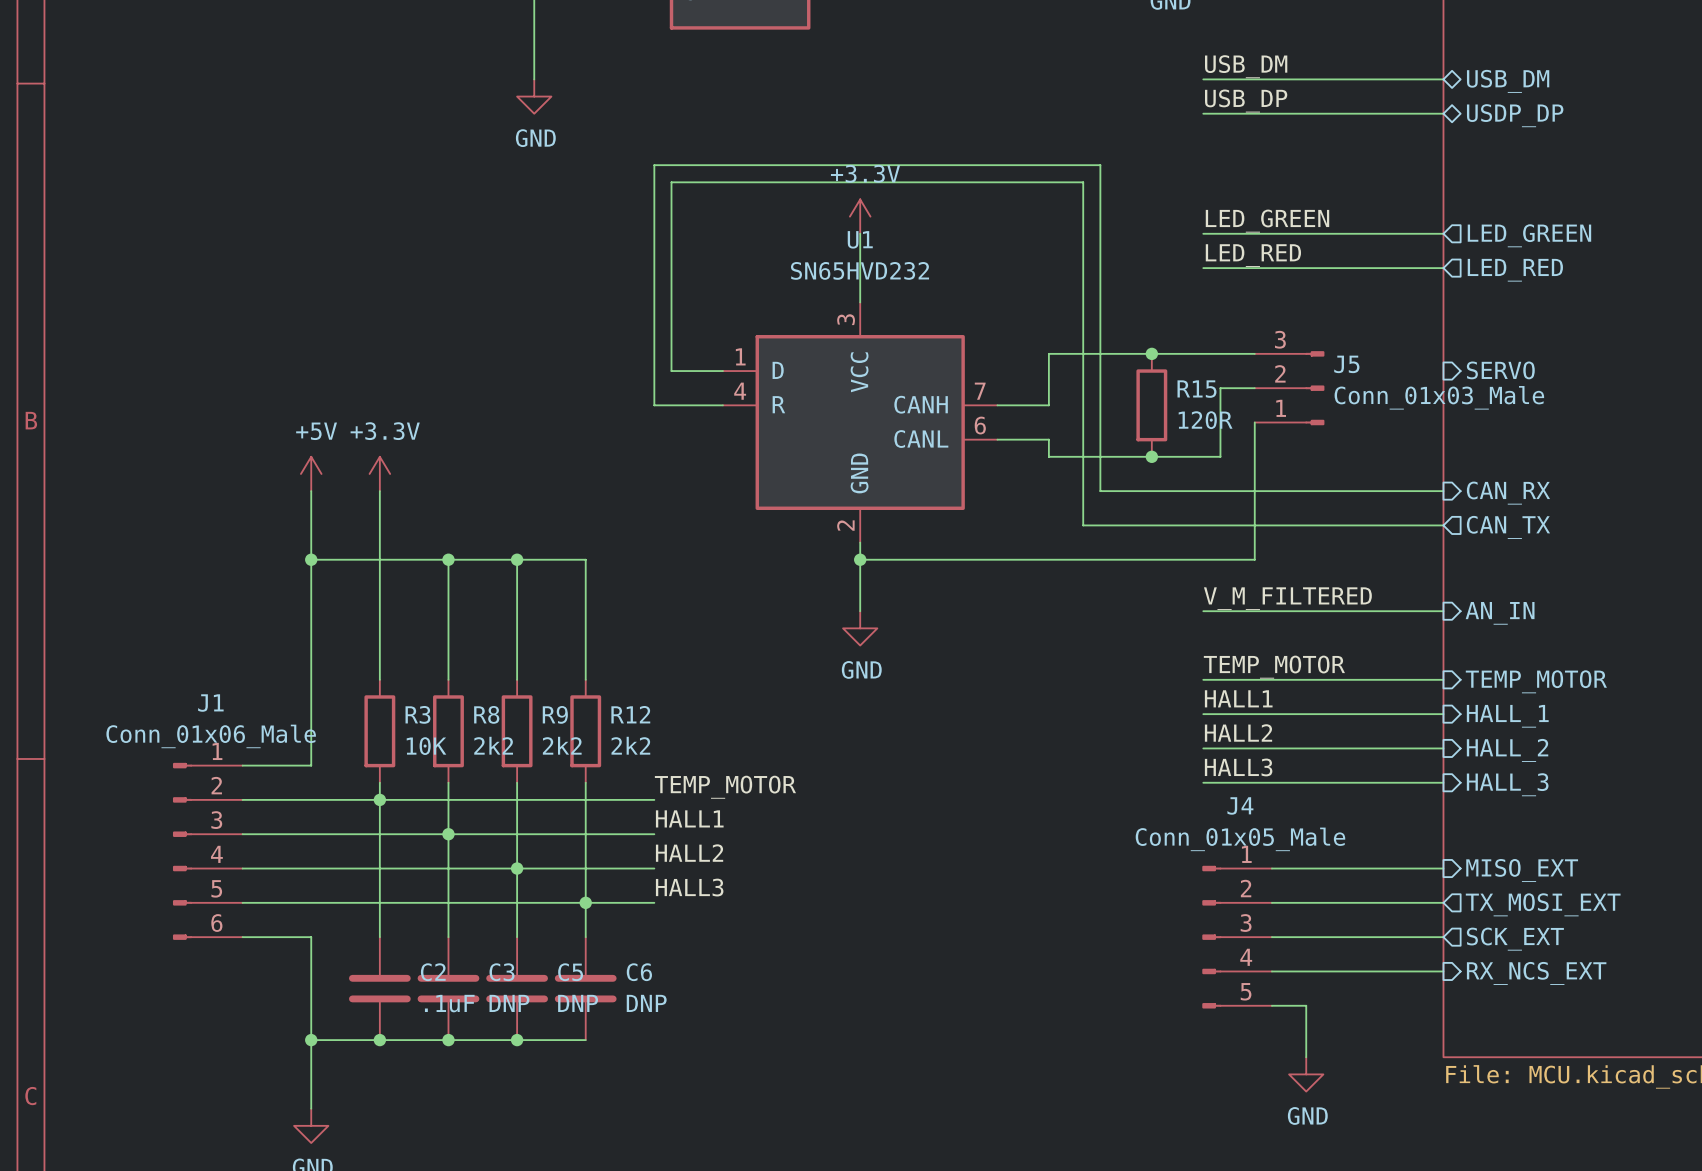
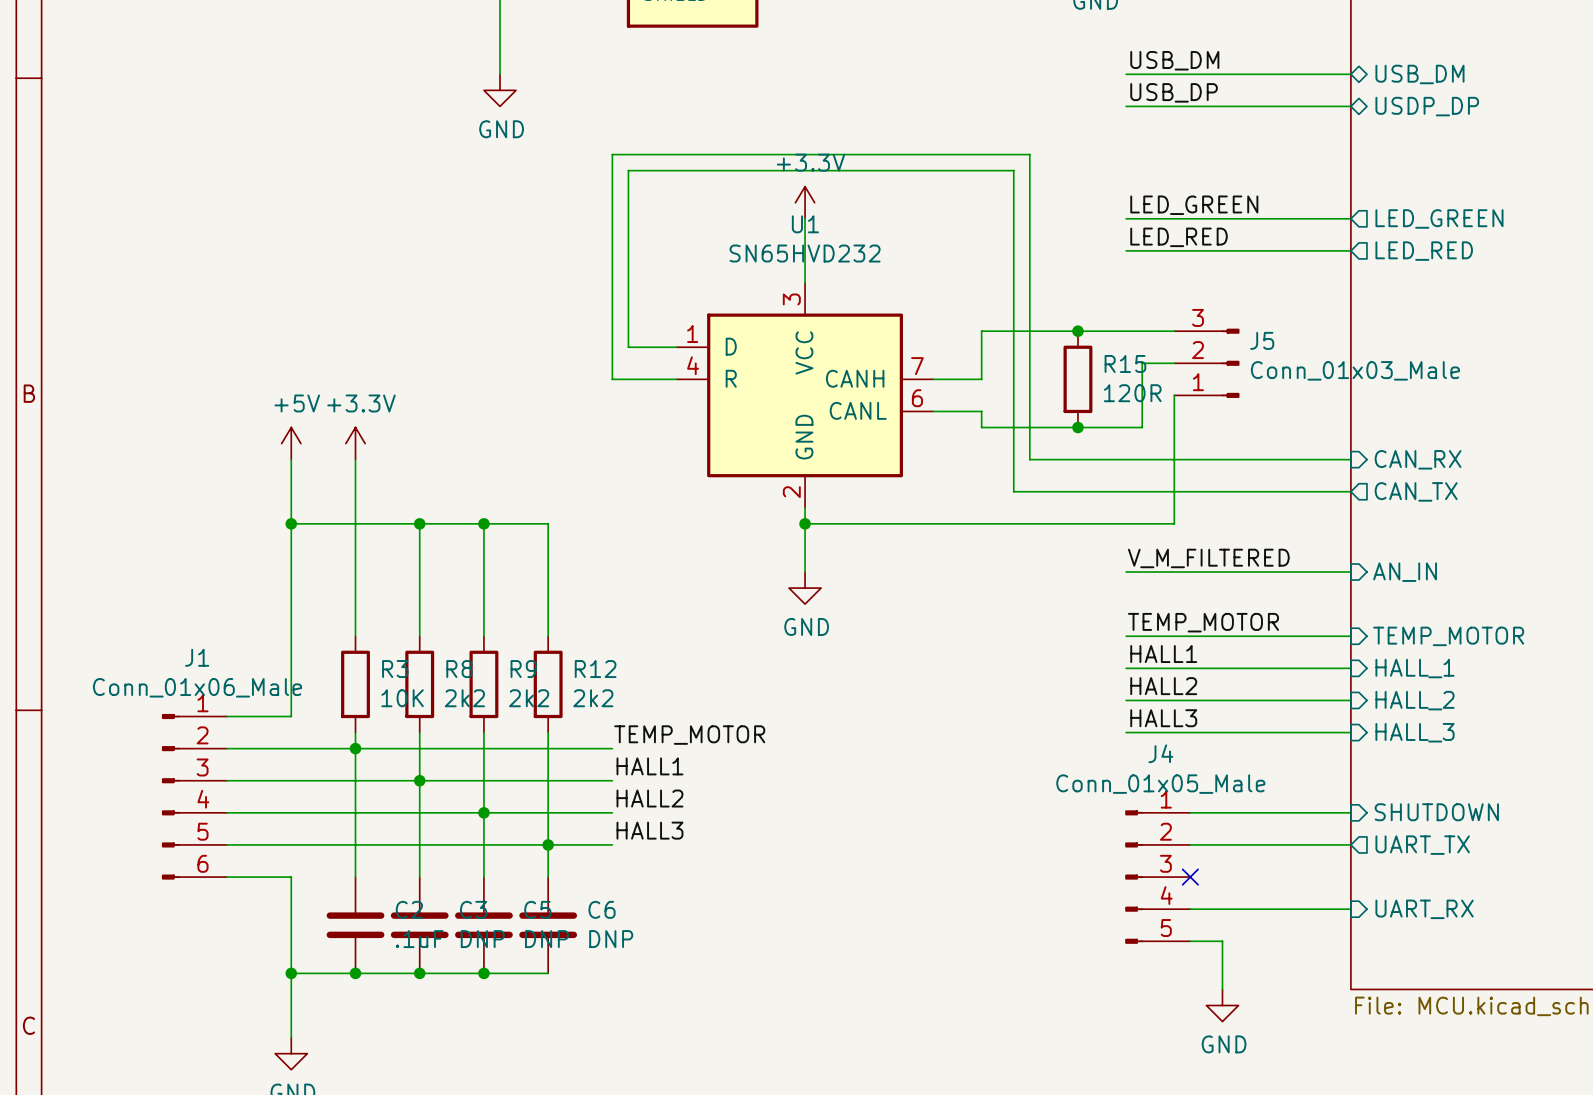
sheet pin: SERVO (1500, 370) -> none
sheet pin: MISO_EXT (1522, 870) -> SHUTDOWN (1436, 812)
sheet pin: TX_MOSI_EXT (1543, 904) -> UART_TX (1422, 845)
wire: (1271, 937) (1443, 937) -> none
no-connect mark: none -> (1190, 877)
sheet pin: SCK_EXT (1515, 939) -> none
sheet pin: RX_NCS_EXT (1536, 973) -> UART_RX (1424, 909)

